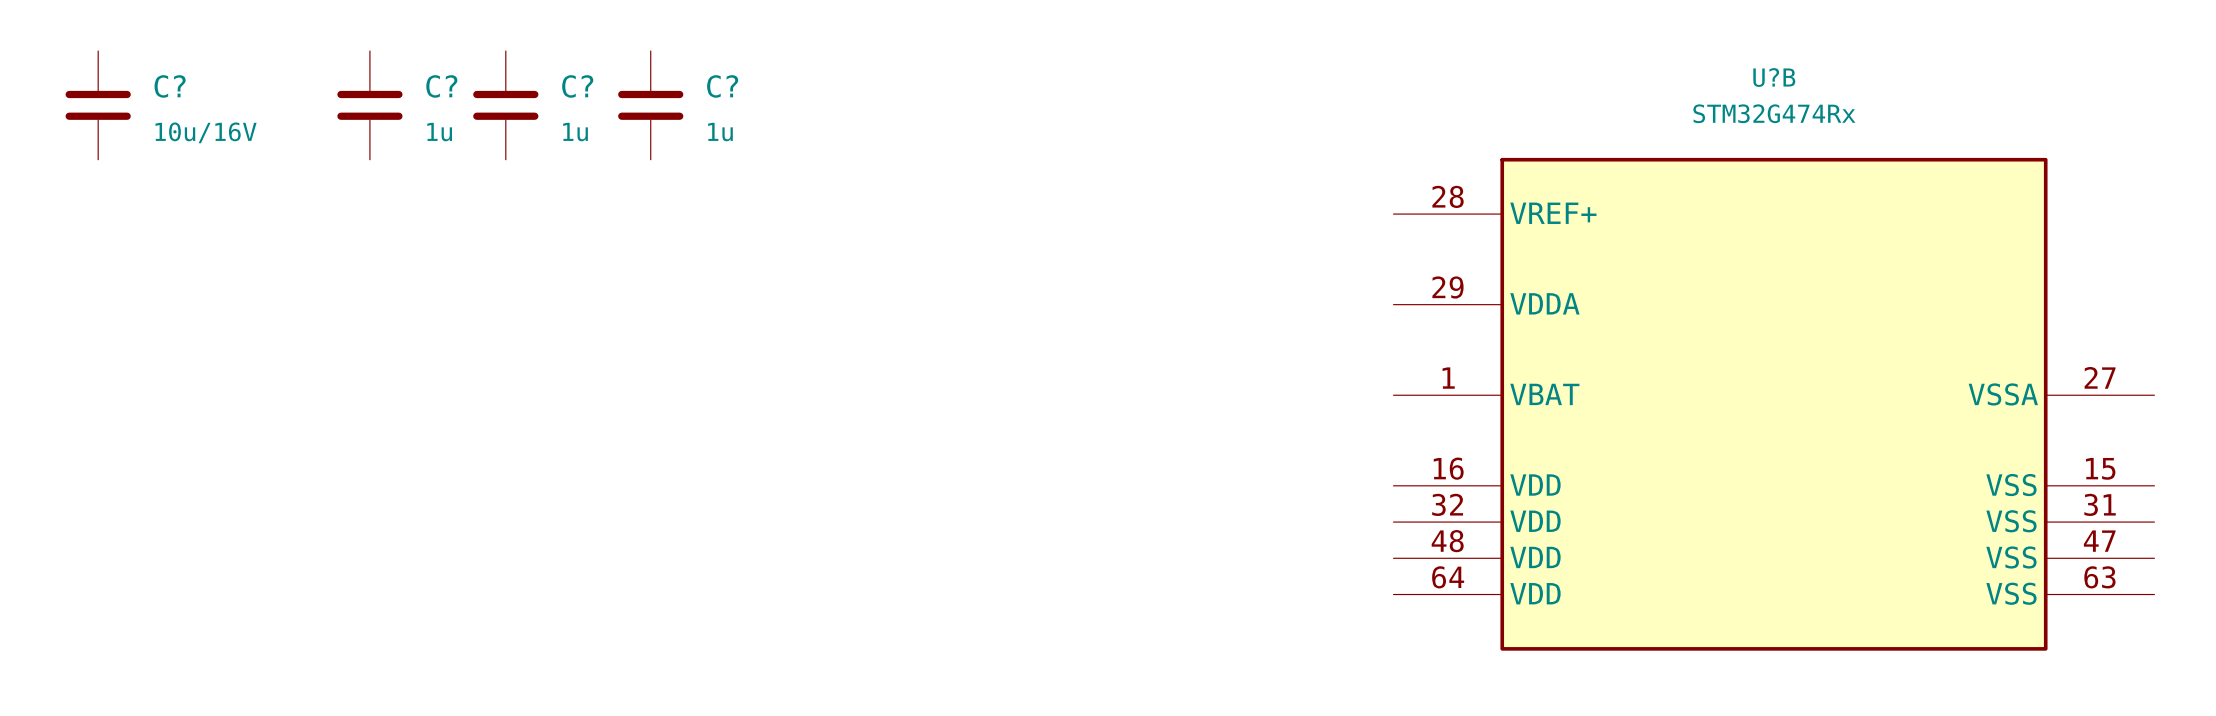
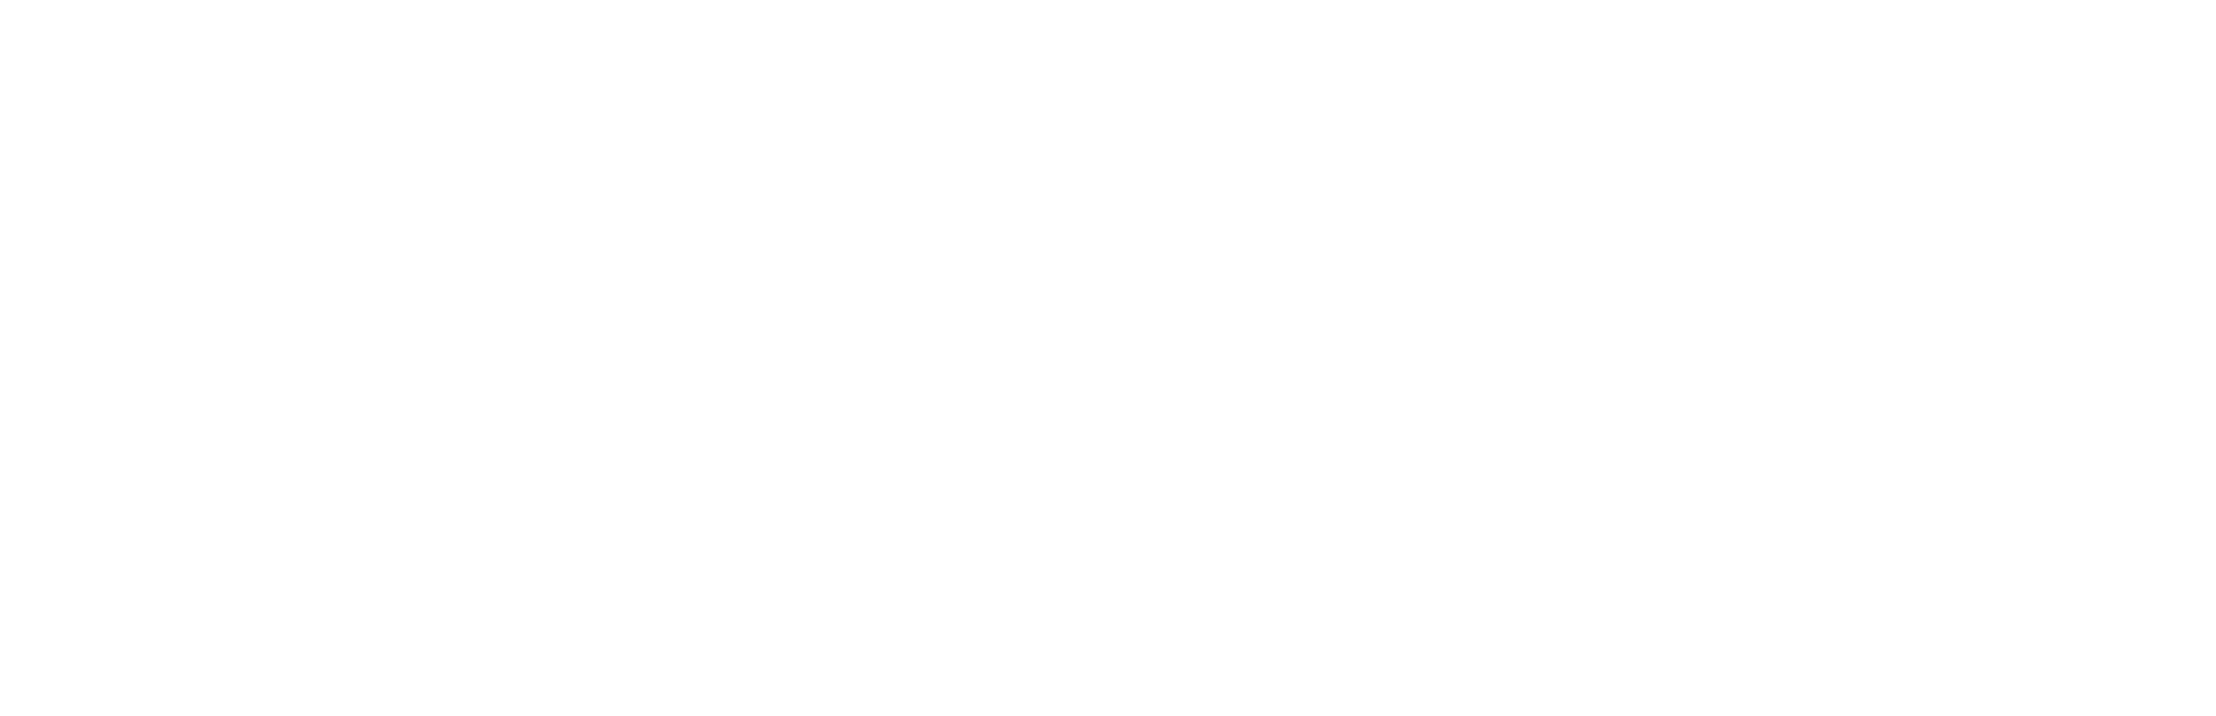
C?: (98, 105) -> none
C?: (369, 105) -> none
C?: (505, 105) -> none
C?: (650, 105) -> none
U?B: STM32G474Rx (1773, 404) -> none

